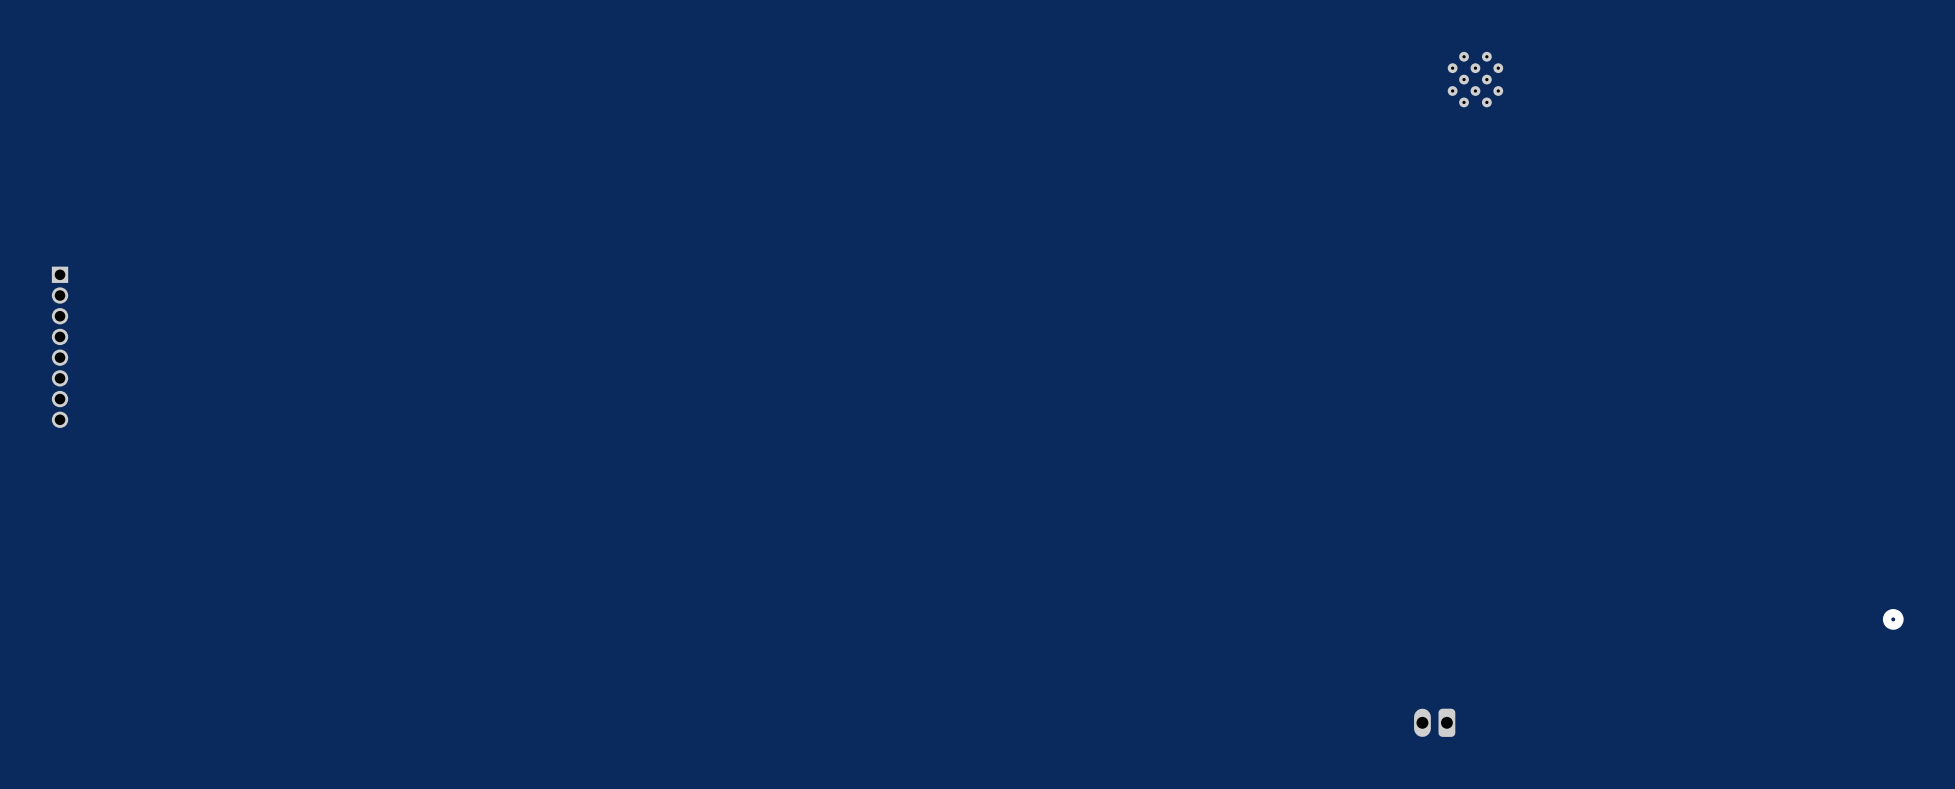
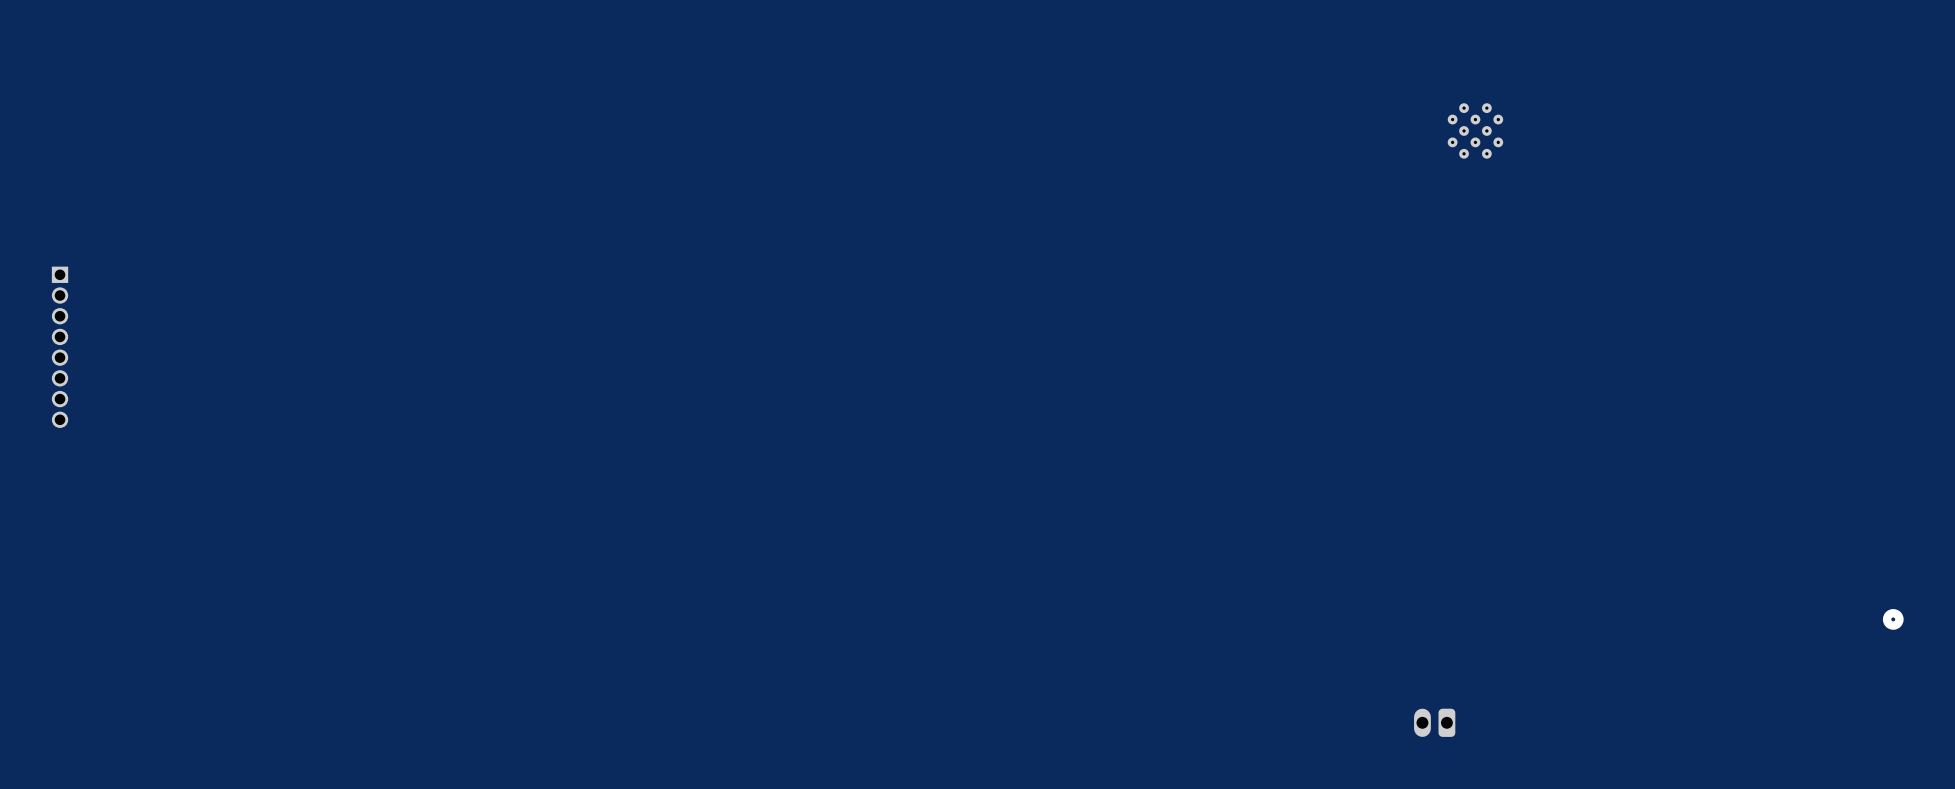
part position: (1475, 79) -> (1475, 130)

